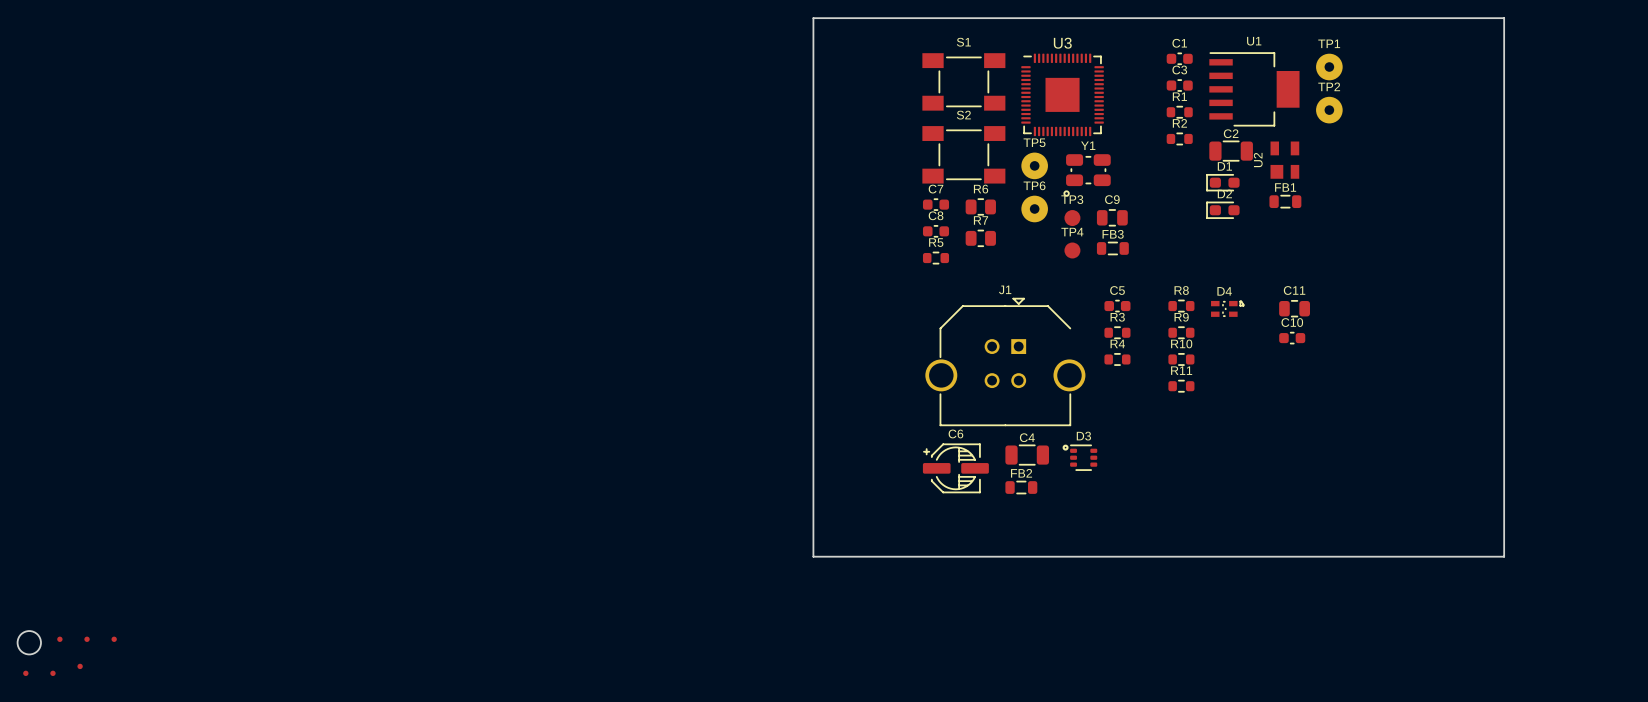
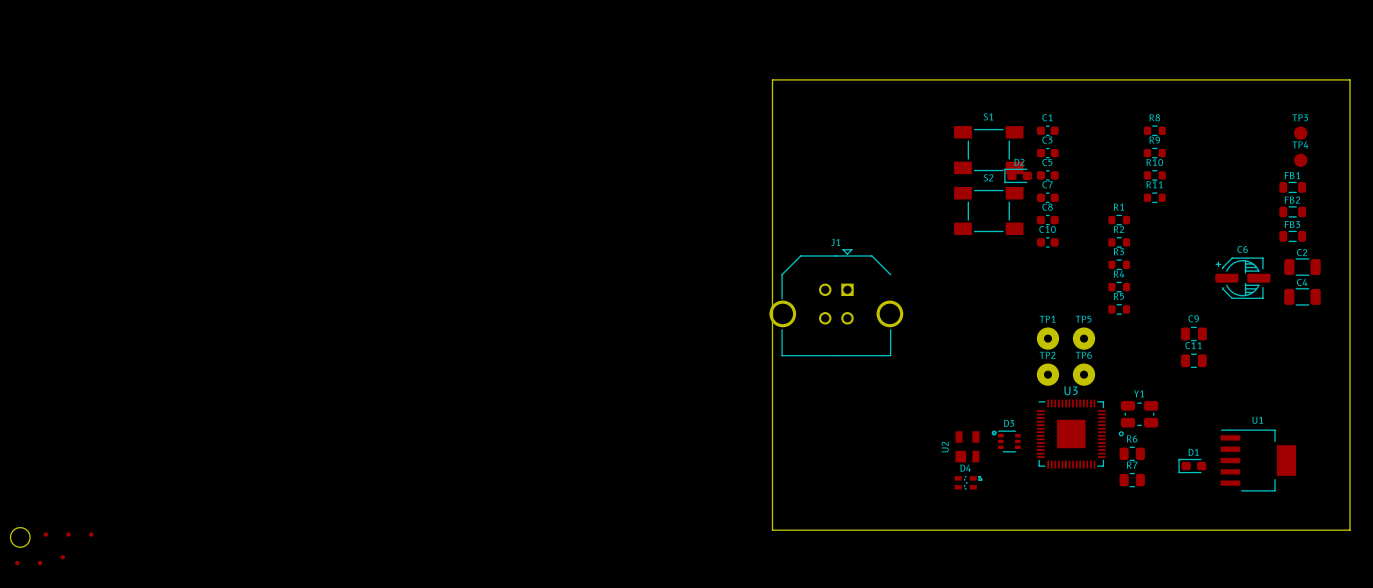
board edge: (813, 18) (1504, 18) (1504, 556) (813, 556) (813, 18) -> (772, 79) (1349, 79) (1349, 530) (772, 530) (772, 79)
C1 position: (1179, 58) -> (1047, 130)
TP1 position: (1329, 67) -> (1047, 338)
S1 position: (963, 81) -> (988, 150)
C3 position: (1179, 85) -> (1047, 153)
U1 position: (1254, 89) -> (1258, 460)
U3 position: (1062, 94) -> (1071, 434)
TP2 position: (1329, 110) -> (1047, 374)
R1 position: (1179, 112) -> (1119, 220)
R2 position: (1179, 138) -> (1119, 242)
C2 position: (1231, 151) -> (1302, 267)
S2 position: (963, 154) -> (988, 211)
U2 position: (1284, 160) -> (967, 446)
TP5 position: (1034, 165) -> (1084, 338)
Y1 position: (1087, 175) -> (1138, 418)
D1 position: (1222, 182) -> (1192, 466)
FB1 position: (1285, 201) -> (1292, 187)
C7 position: (935, 204) -> (1047, 197)
R6 position: (980, 206) -> (1132, 453)
TP6 position: (1034, 208) -> (1084, 374)
C9 position: (1112, 217) -> (1193, 333)
TP3 position: (1072, 218) -> (1300, 133)
C8 position: (935, 231) -> (1047, 220)
R7 position: (980, 238) -> (1132, 480)
FB3 position: (1112, 248) -> (1292, 236)
TP4 position: (1072, 250) -> (1300, 160)
R5 position: (935, 258) -> (1119, 309)
C5 position: (1117, 306) -> (1047, 175)
R8 position: (1181, 306) -> (1154, 130)
D4 position: (1227, 308) -> (968, 482)
C11 position: (1294, 308) -> (1193, 360)
R3 position: (1117, 332) -> (1119, 264)
R9 position: (1181, 332) -> (1154, 153)
C10 position: (1292, 338) -> (1047, 242)
R4 position: (1117, 359) -> (1119, 287)
R10 position: (1181, 359) -> (1154, 175)
R11 position: (1181, 386) -> (1154, 197)
C4 position: (1027, 455) -> (1302, 296)
D3 position: (1079, 457) -> (1006, 441)
C6 position: (955, 468) -> (1242, 278)
FB2 position: (1021, 487) -> (1292, 211)

